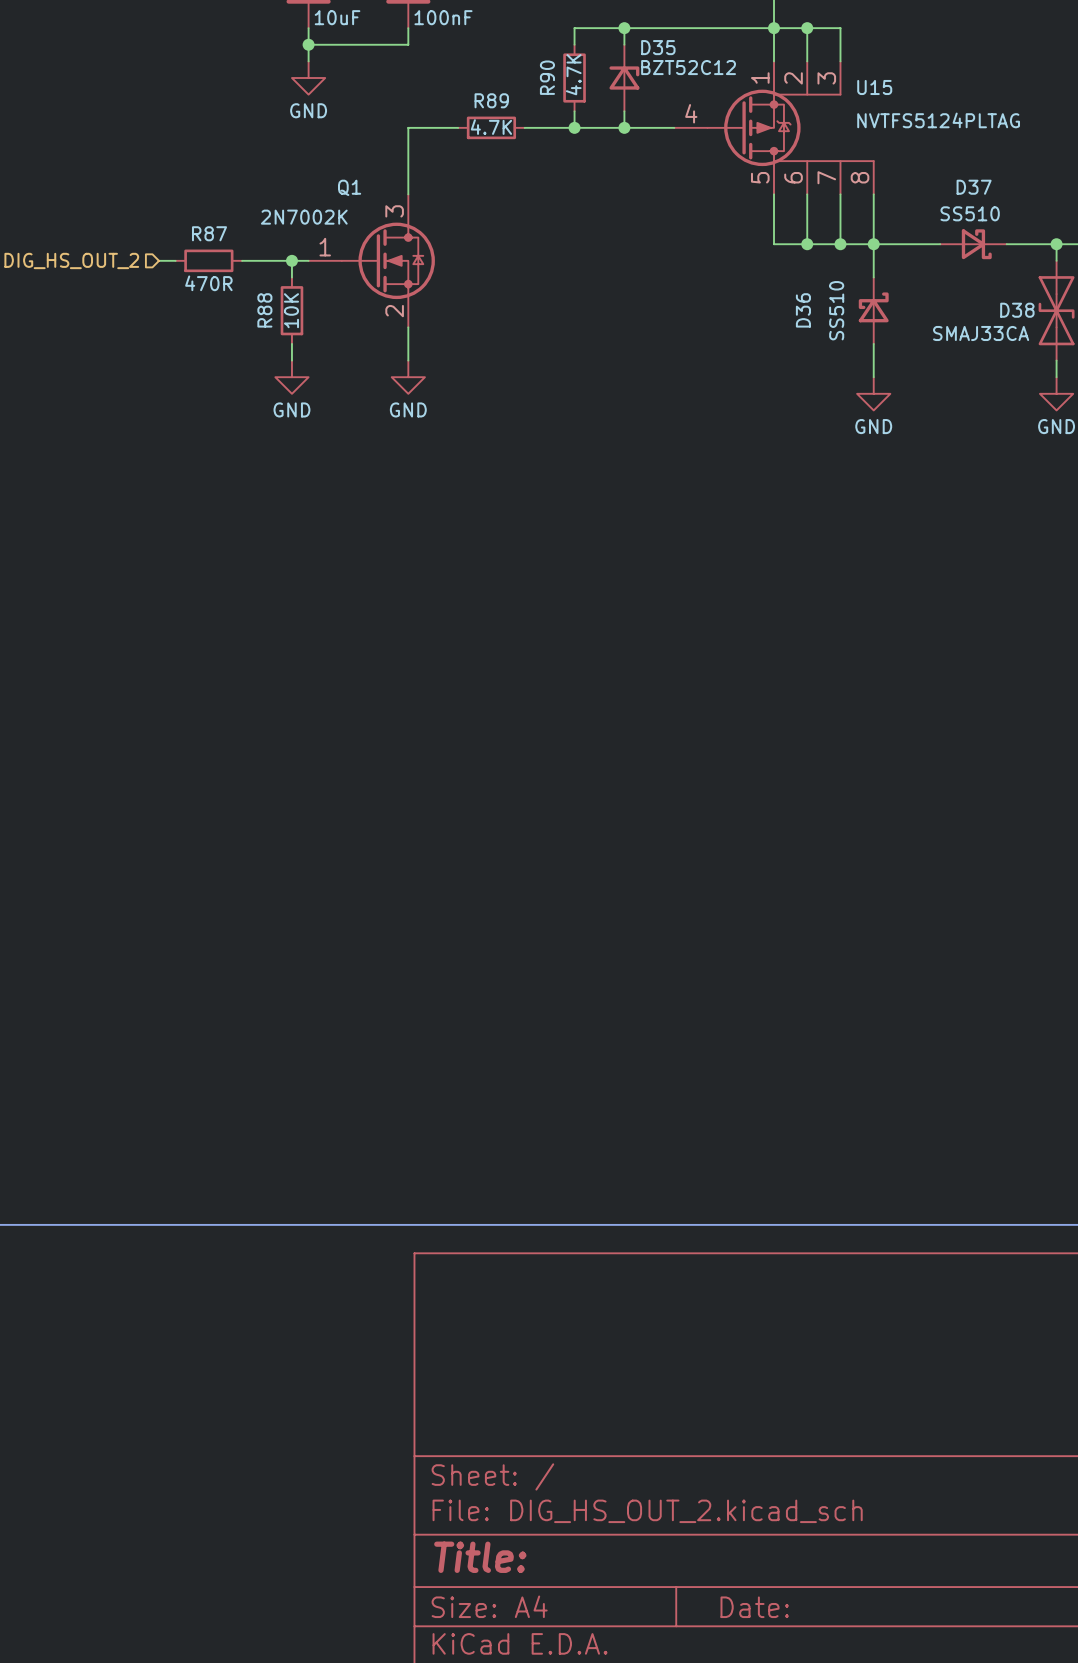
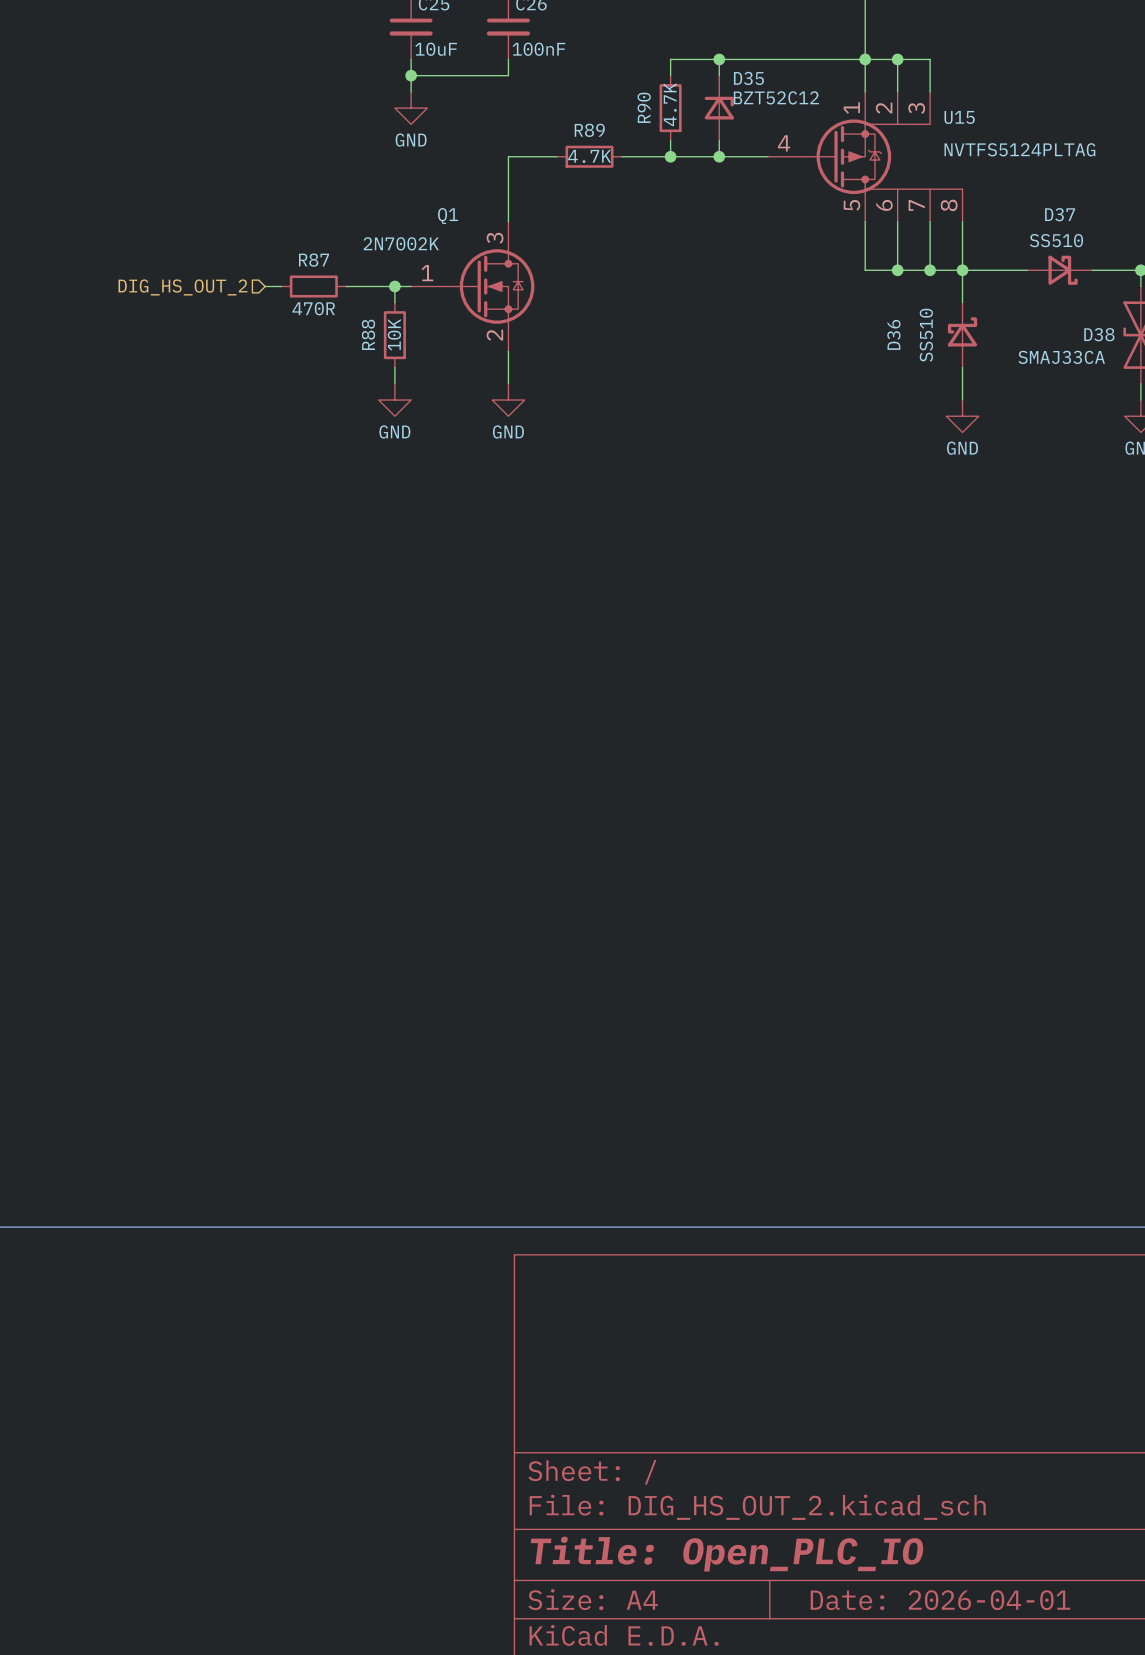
title block: Title: (480, 1557) -> Title: Open_PLC_IO (727, 1554)
title block: Date: (754, 1607) -> Date: 2026-04-01 (940, 1600)

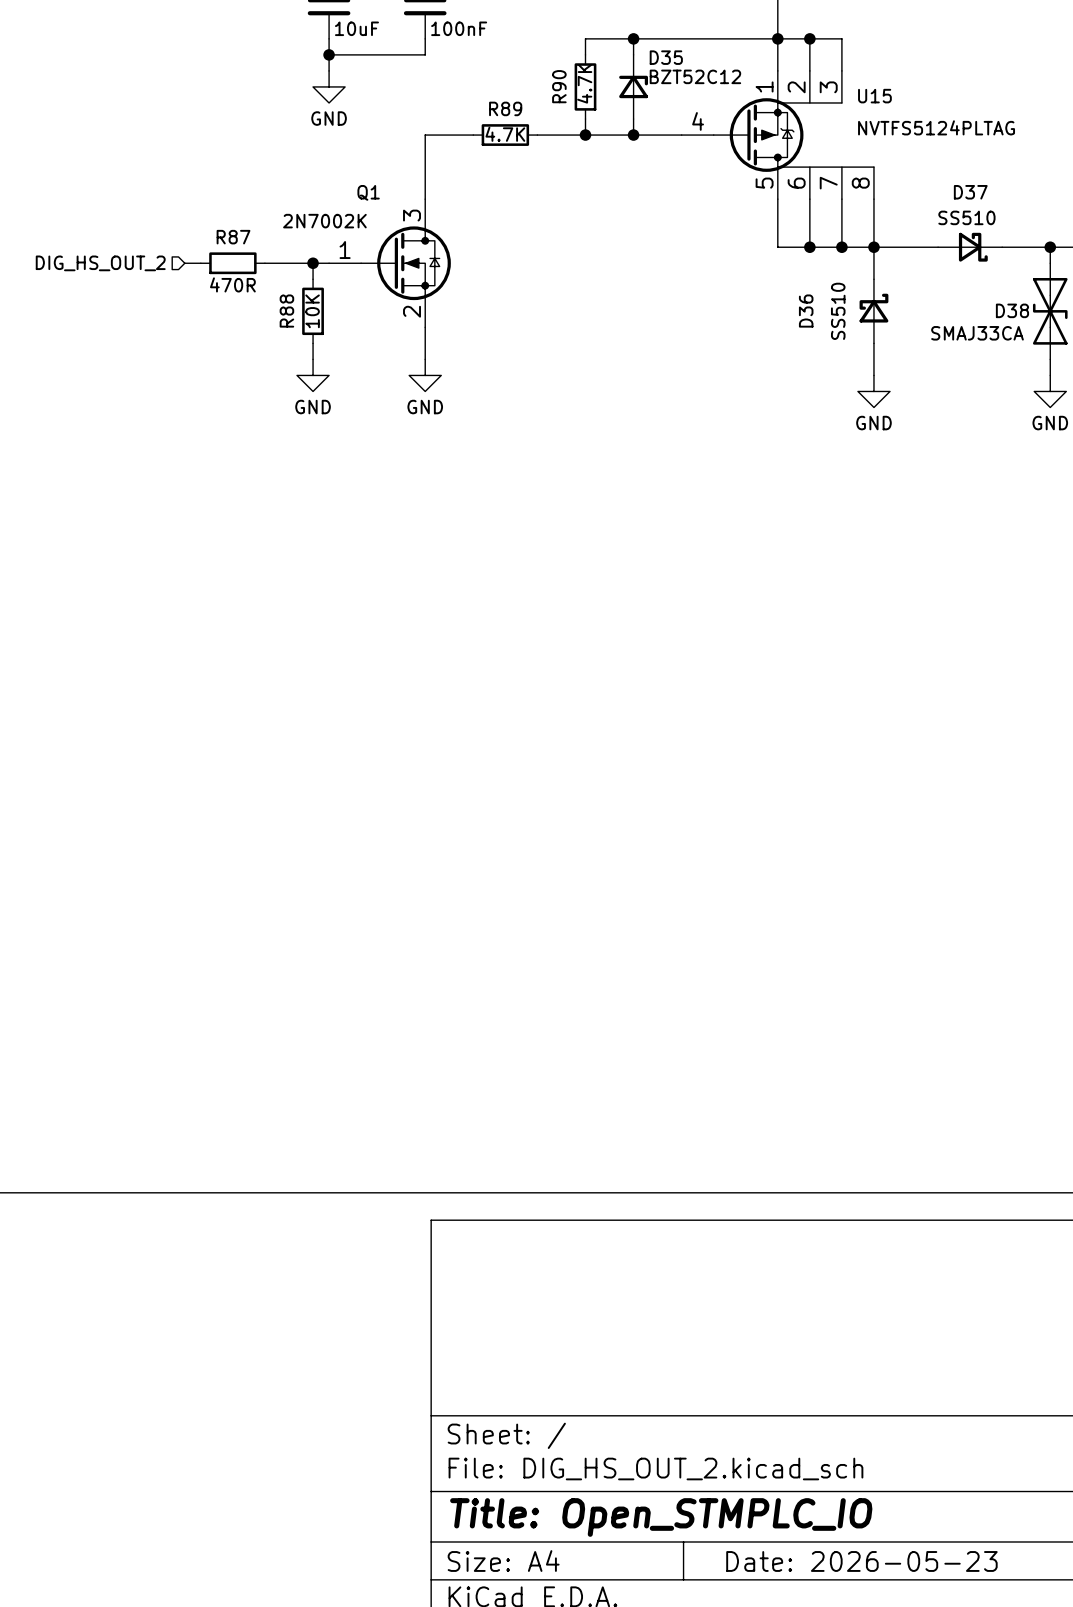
title block: Title: Open_PLC_IO (727, 1554) -> Title: Open_STMPLC_IO (661, 1517)
title block: Date: 2026-04-01 (940, 1600) -> Date: 2026-05-23 (861, 1561)

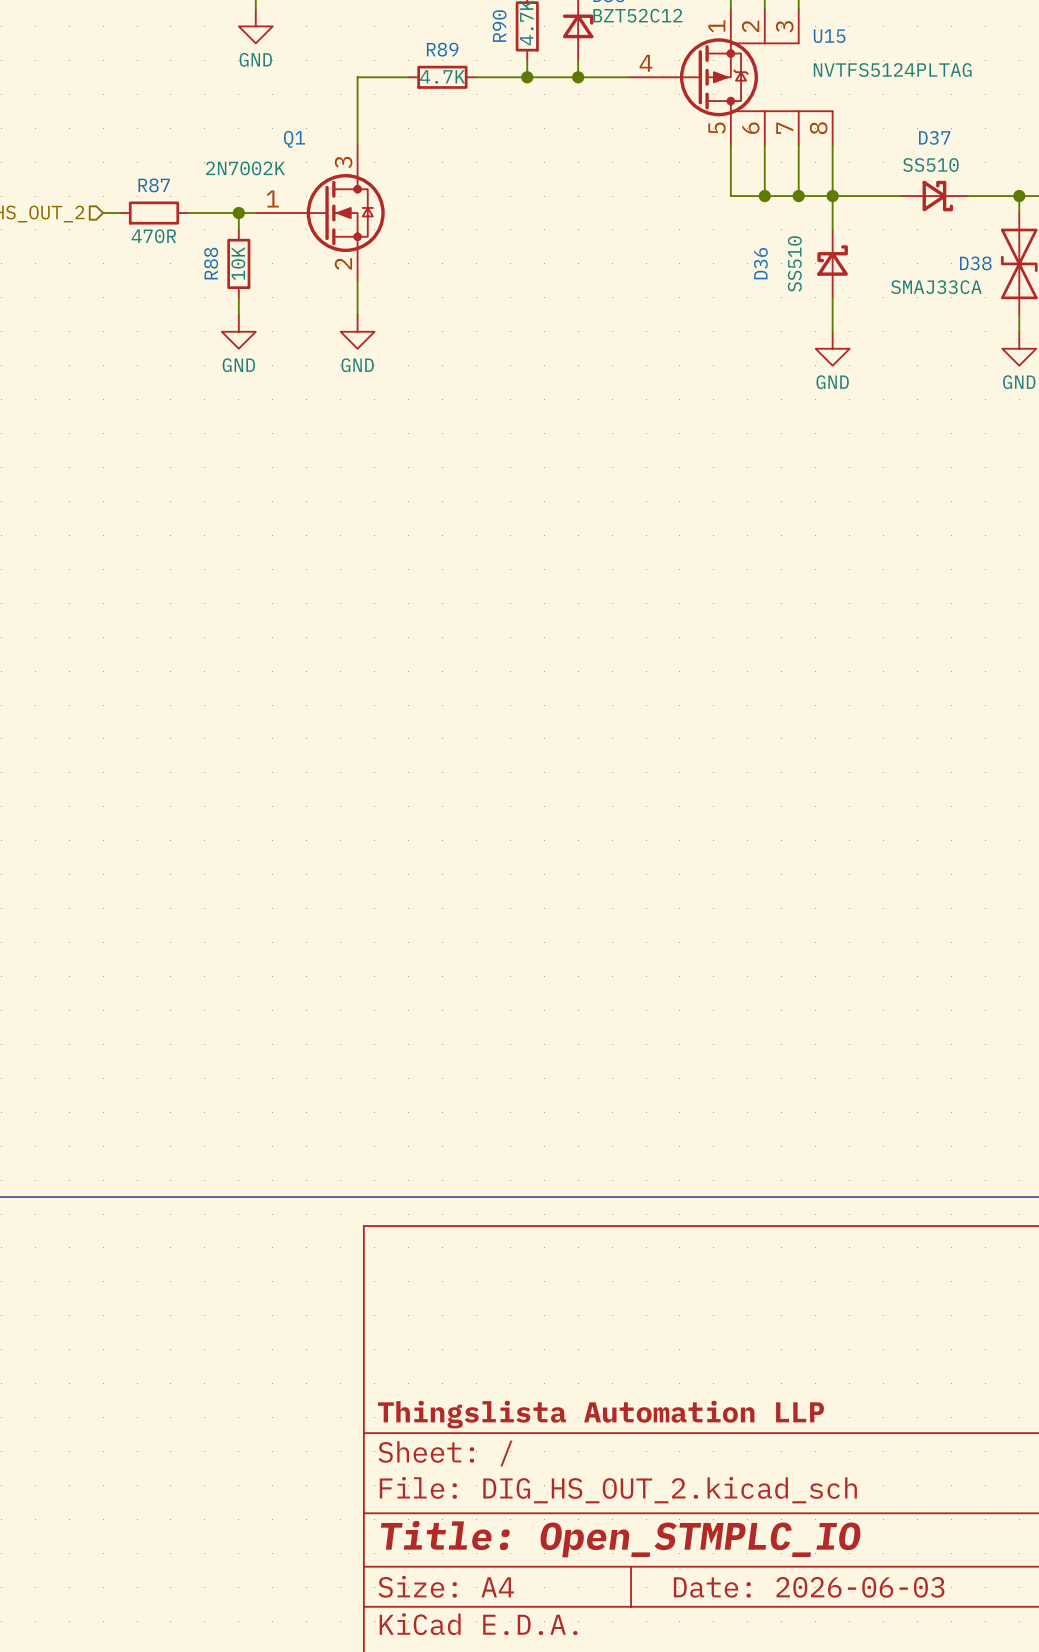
title block: none -> Thingslista Automation LLP (600, 1414)
title block: Date: 2026-05-23 (861, 1561) -> Date: 2026-06-03 (809, 1587)

